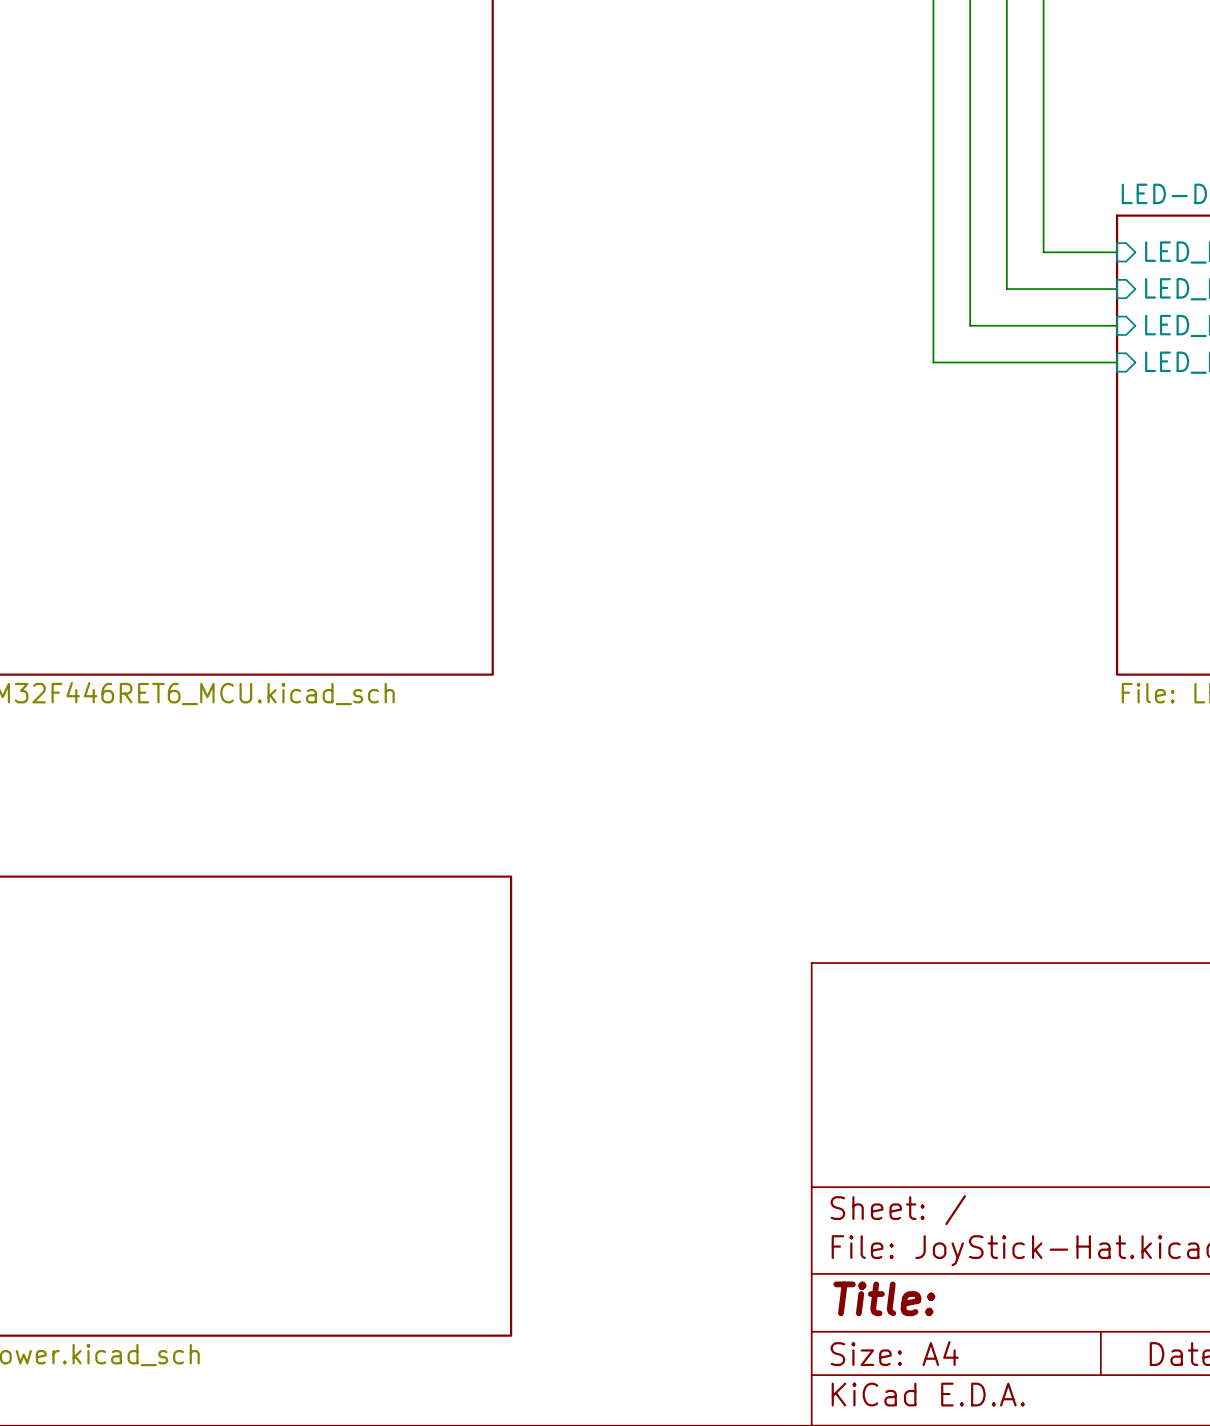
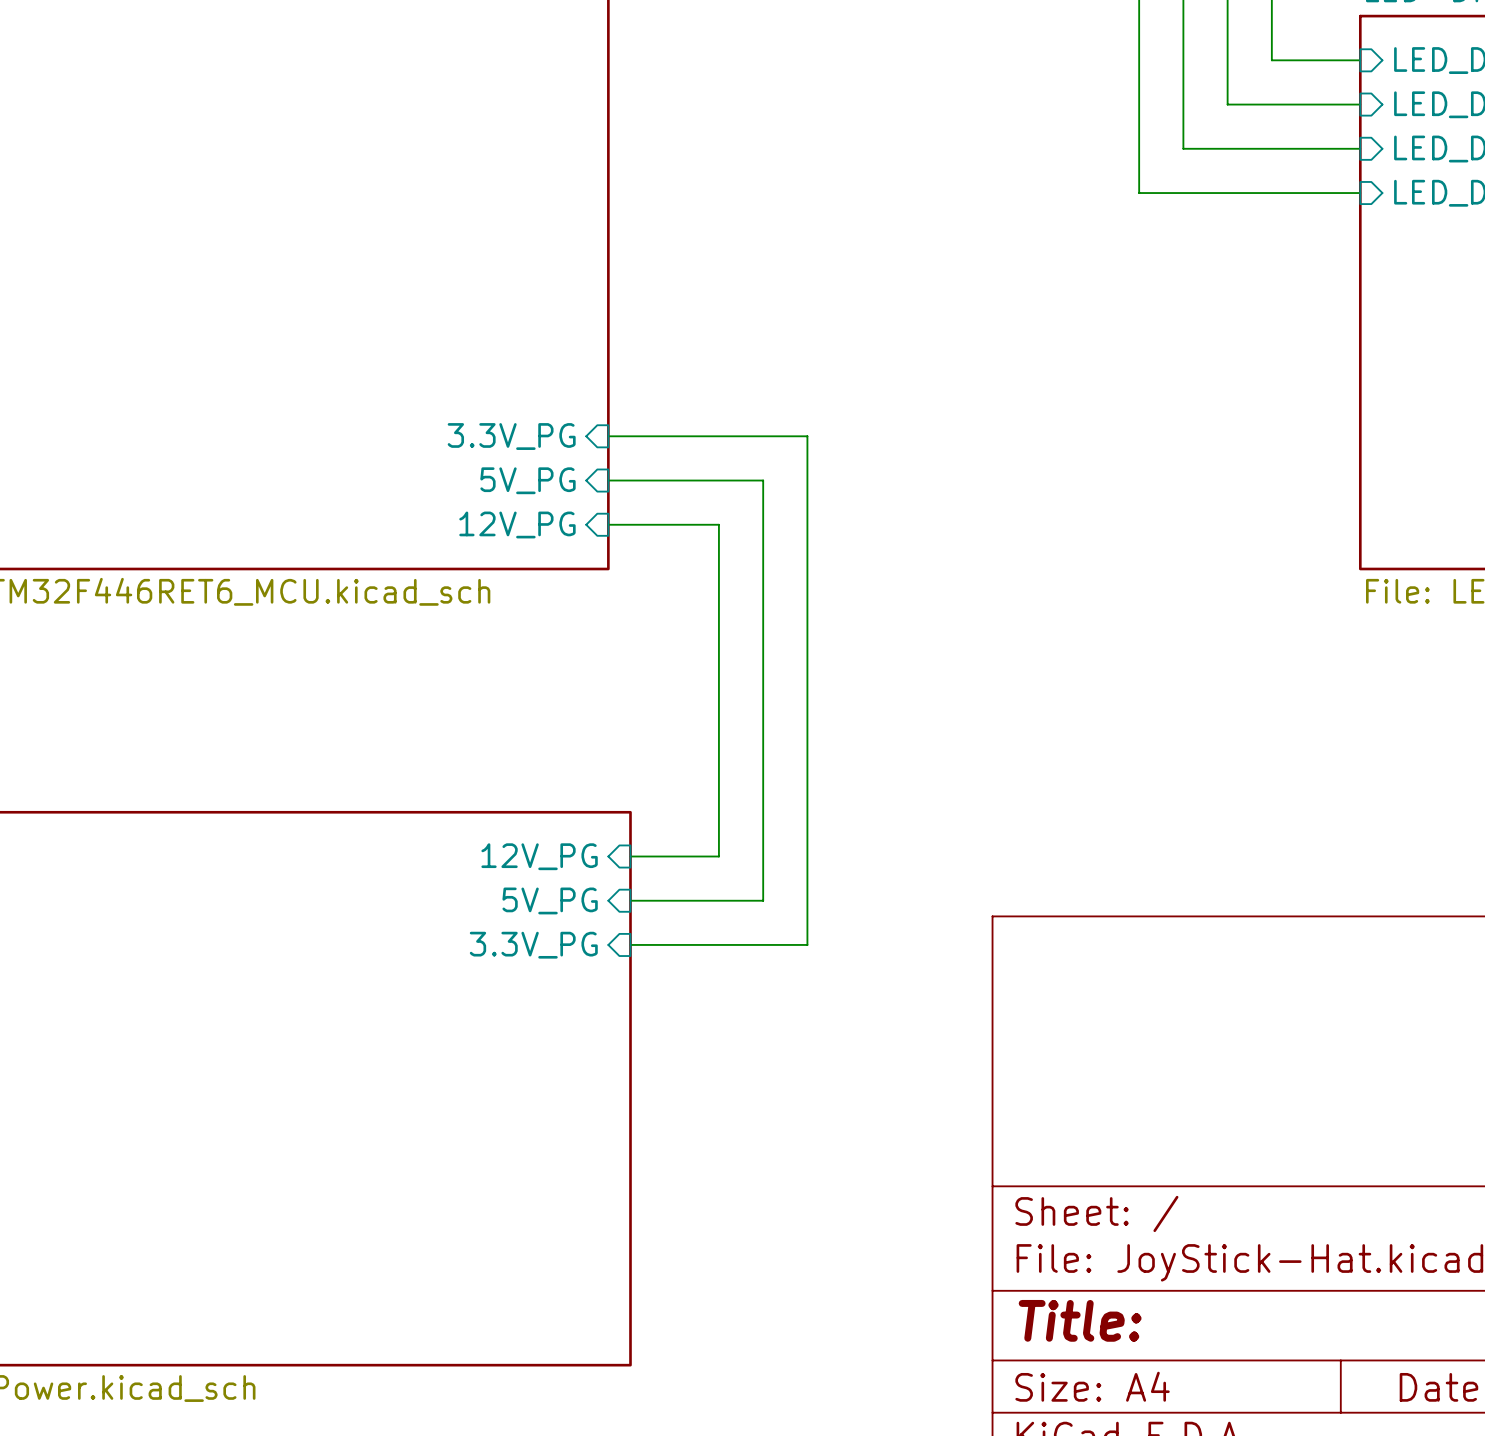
sheet pin: none -> 3.3V_PG (511, 436)
wire: none -> (608, 436) (807, 436) (807, 944) (630, 944)
sheet pin: none -> 5V_PG (527, 480)
wire: none -> (608, 480) (763, 480) (763, 900) (630, 900)
wire: none -> (608, 524) (718, 524) (718, 856) (630, 856)
sheet pin: none -> 12V_PG (517, 524)
sheet pin: none -> 12V_PG (539, 856)
sheet pin: none -> 5V_PG (550, 900)
sheet pin: none -> 3.3V_PG (533, 945)

